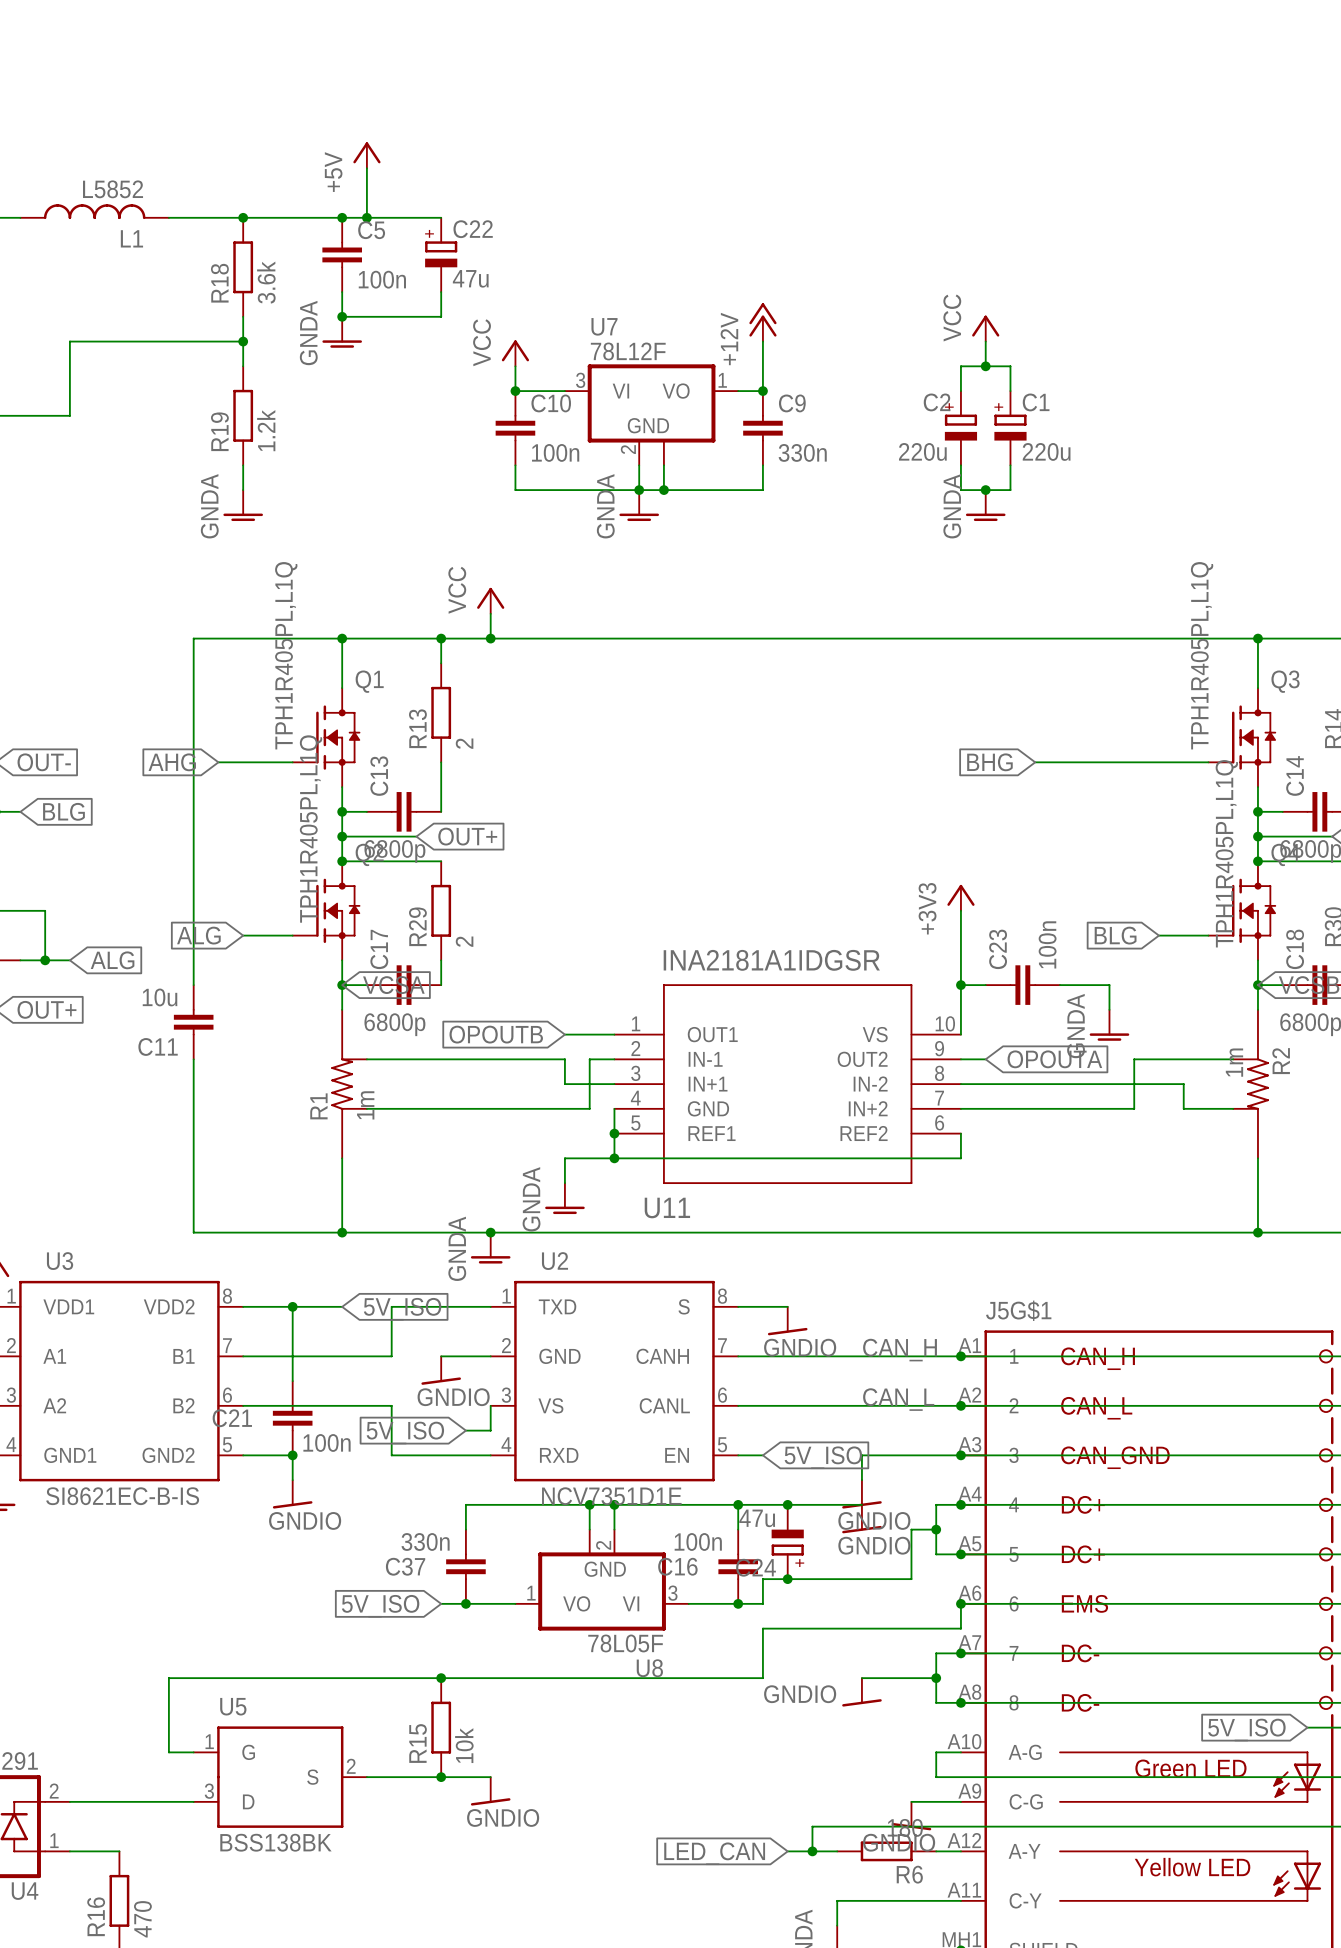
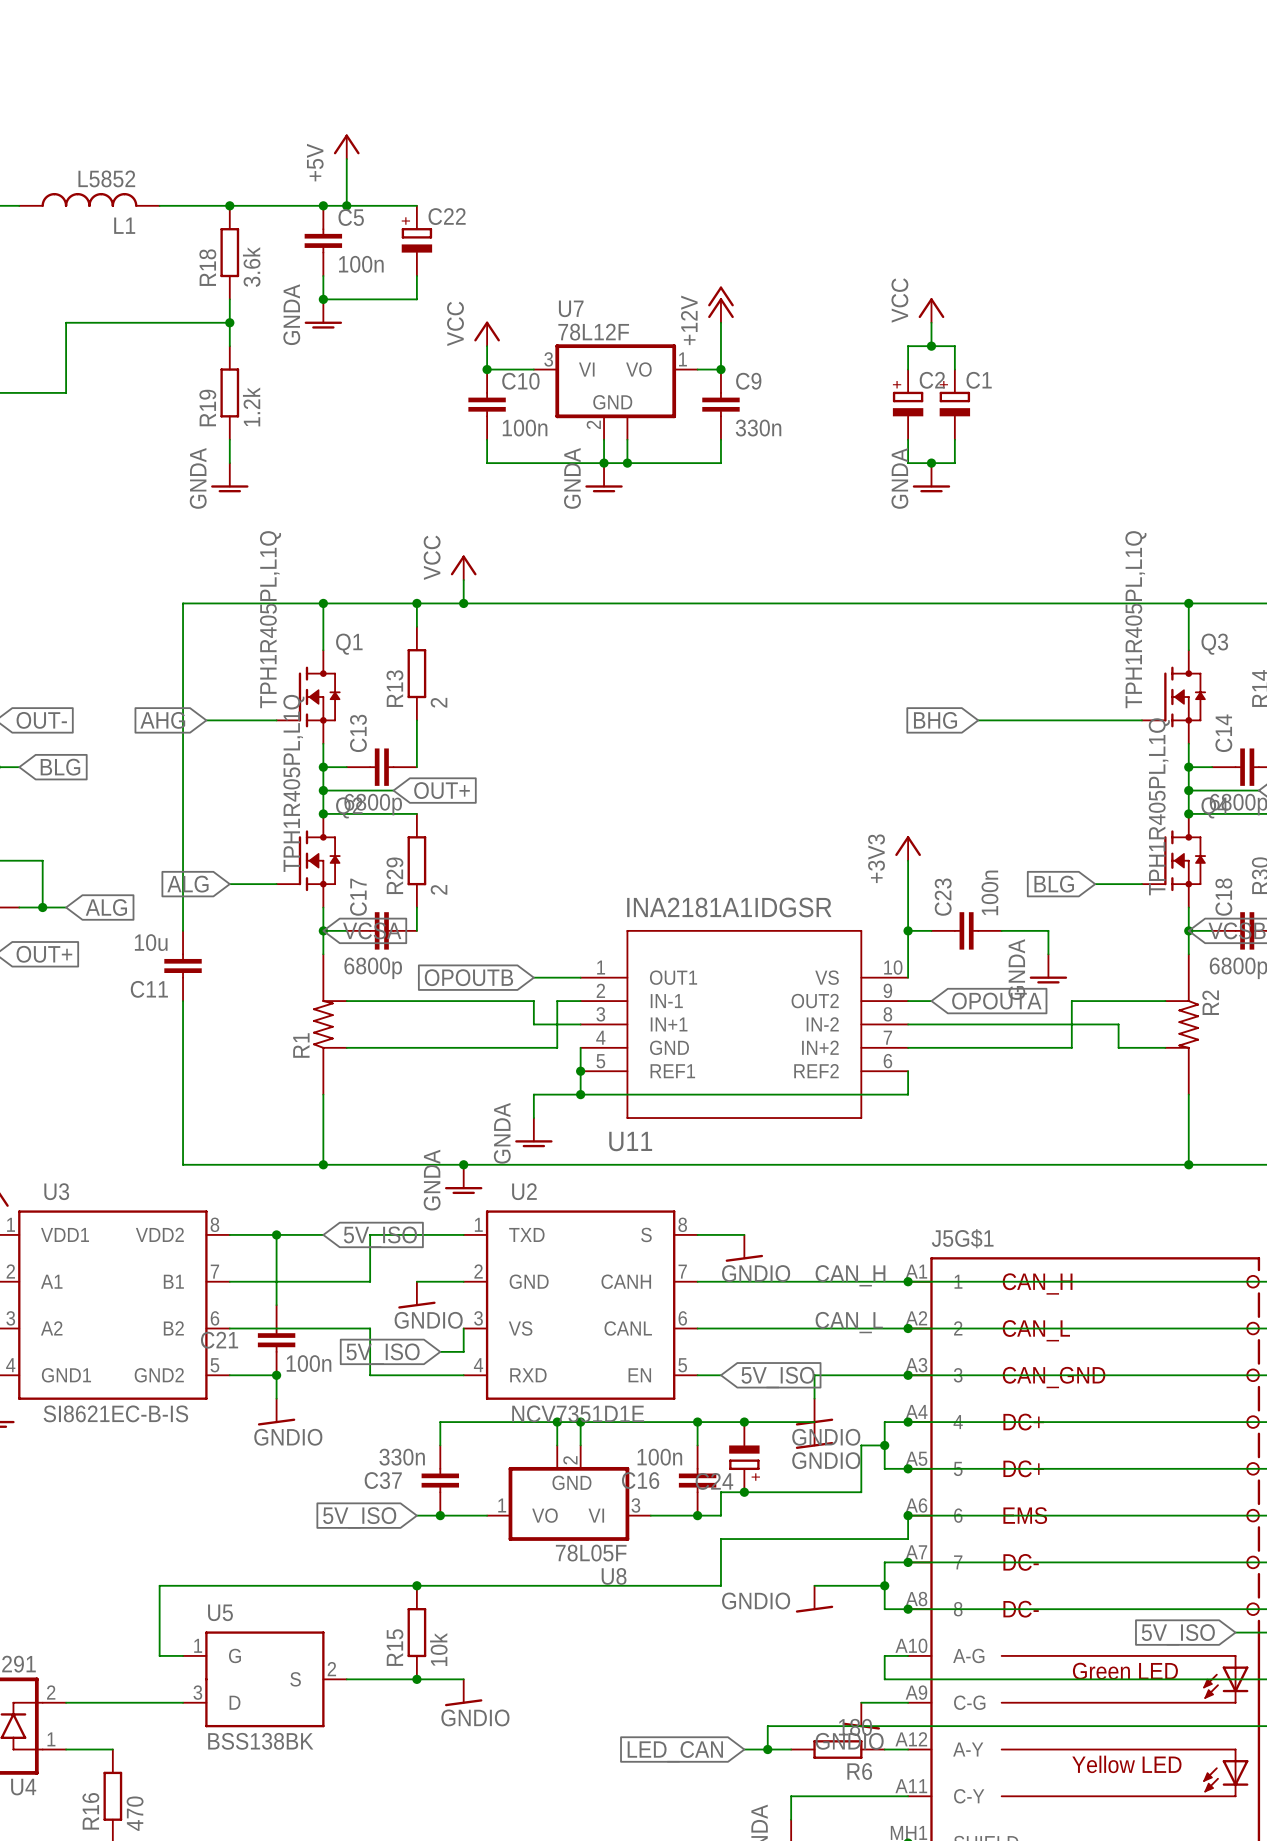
C22 value: 47u (470, 278) -> none
C2 name position: C2 (937, 402) -> C2 (932, 380)
C2 value: 220u (922, 451) -> none
C1 value: 220u (1046, 451) -> none
R2 value: 1m (1234, 1062) -> none
R1 value: 1m (365, 1105) -> none
C24 value: 47u (757, 1518) -> none

